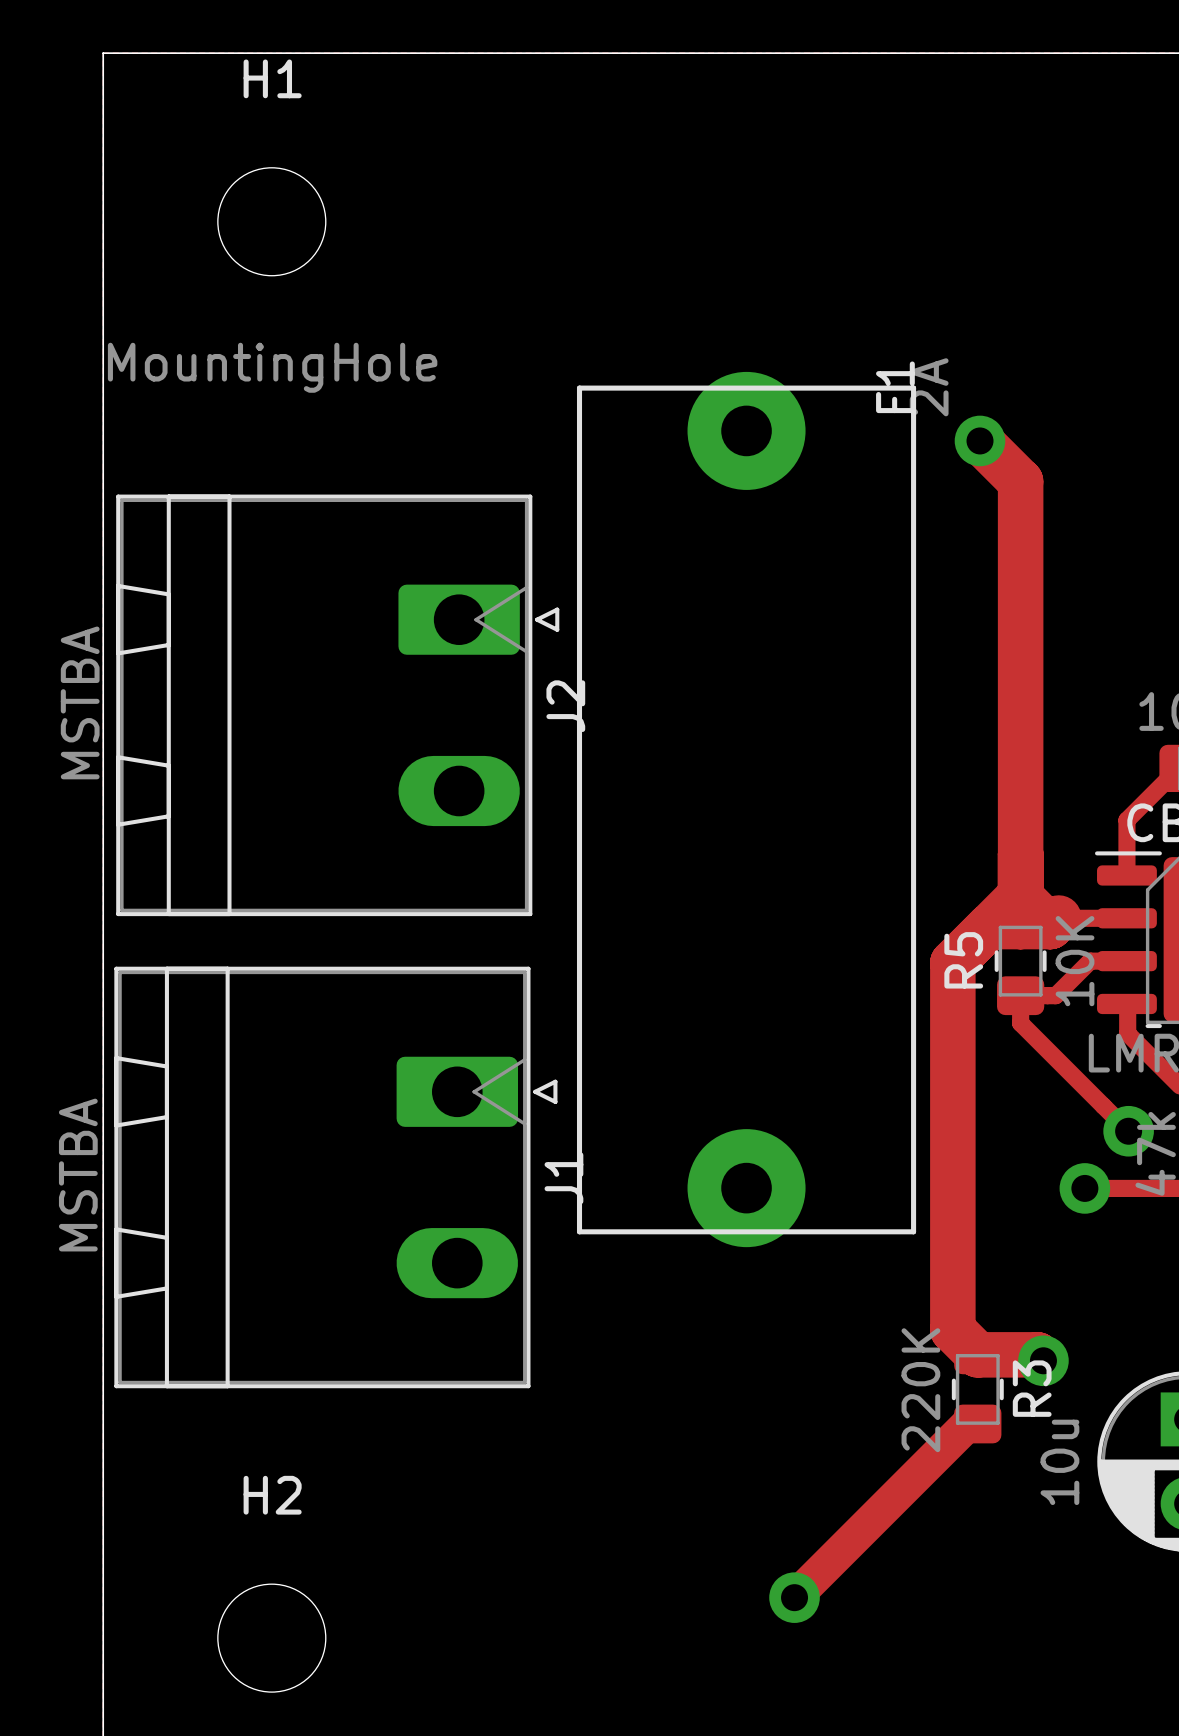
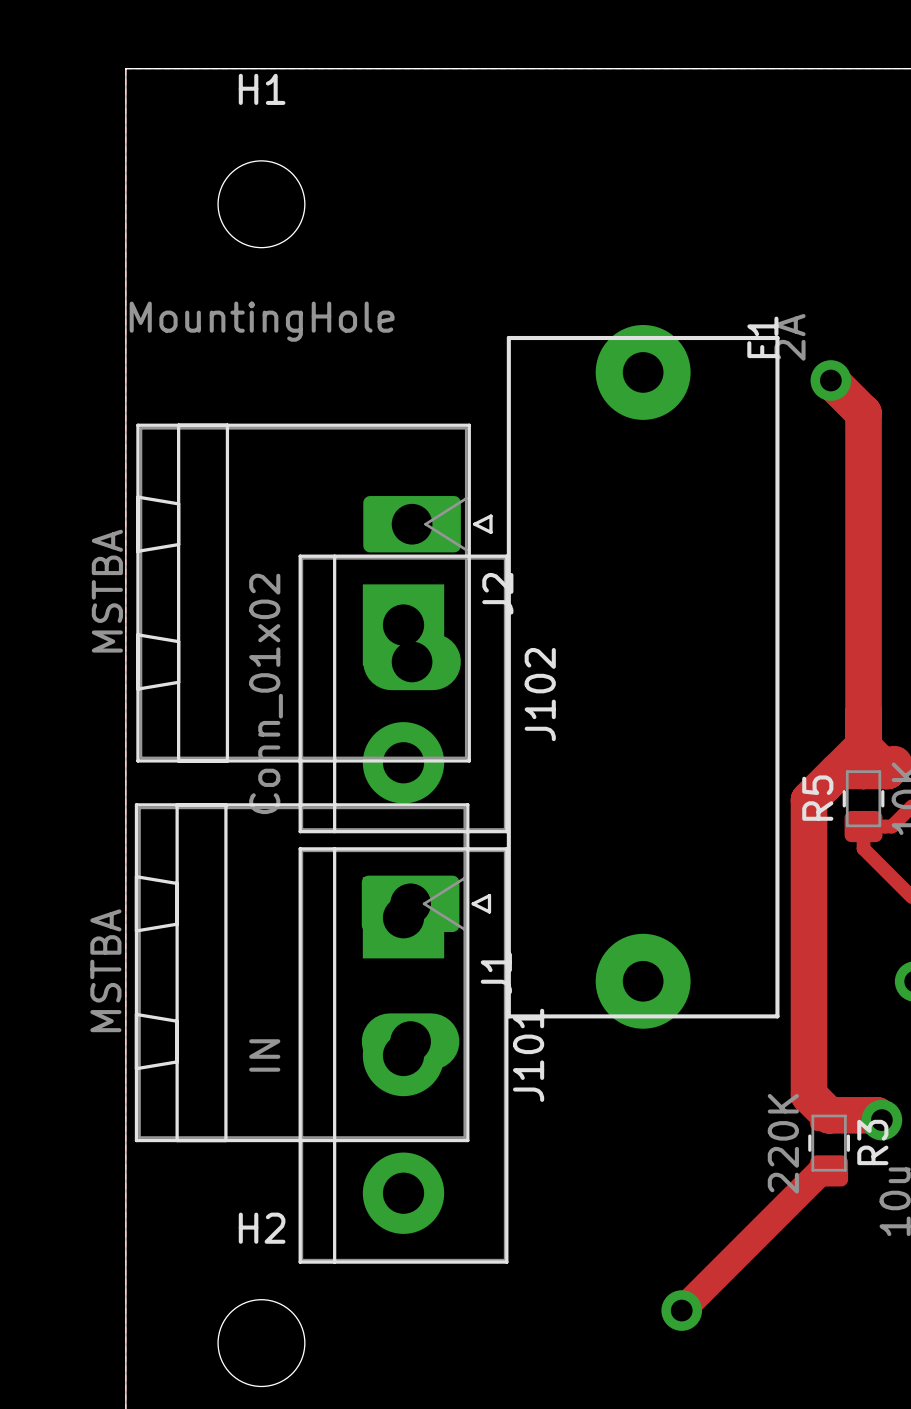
J102: none -> Conn_01x02 (403, 693)
J101: none -> IN (403, 1055)

